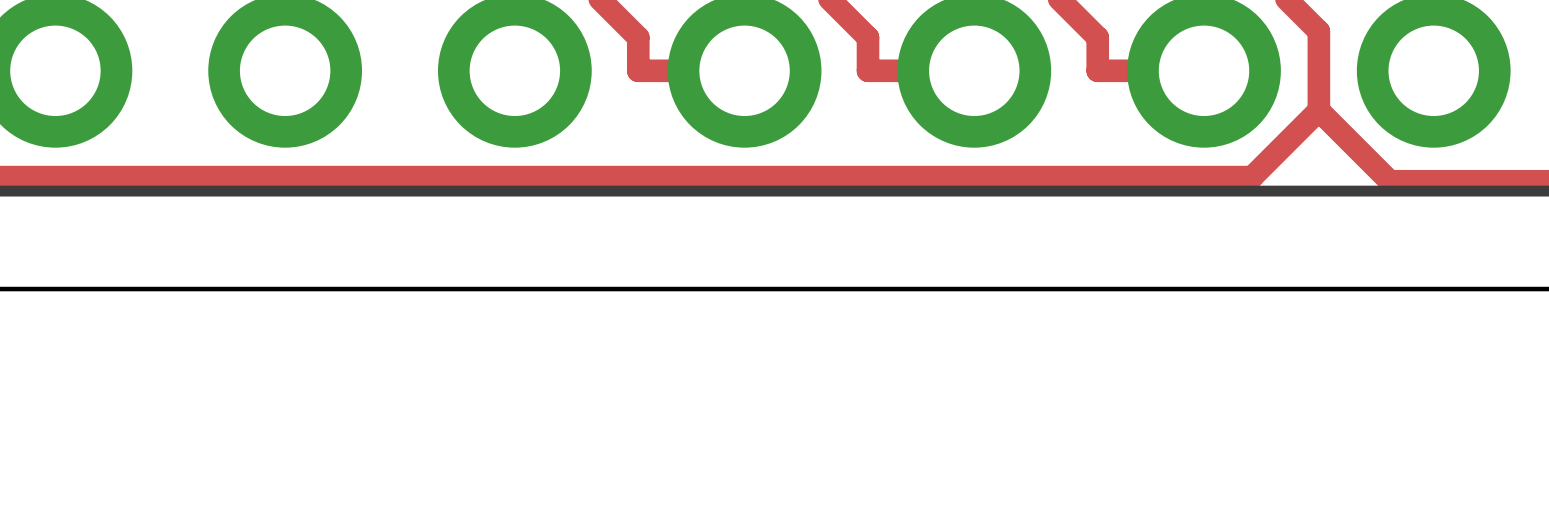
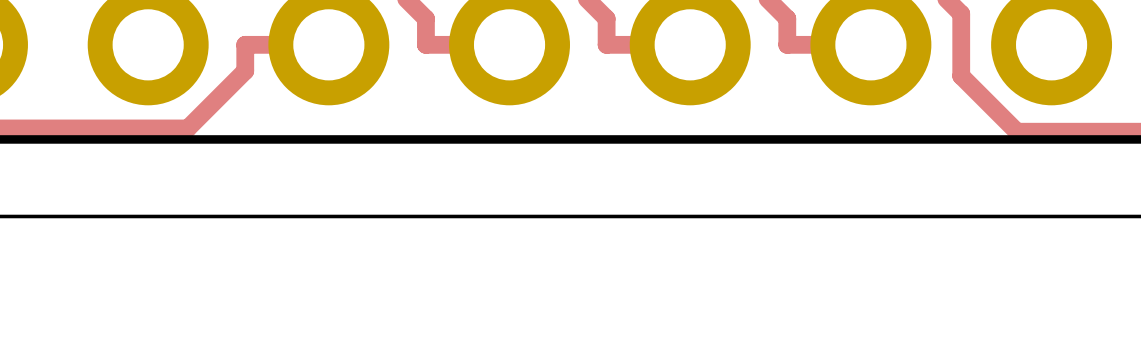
track: (1318, 110) (1252, 177) (335, 177) -> (328, 44) (245, 44) (245, 70) (187, 128)

